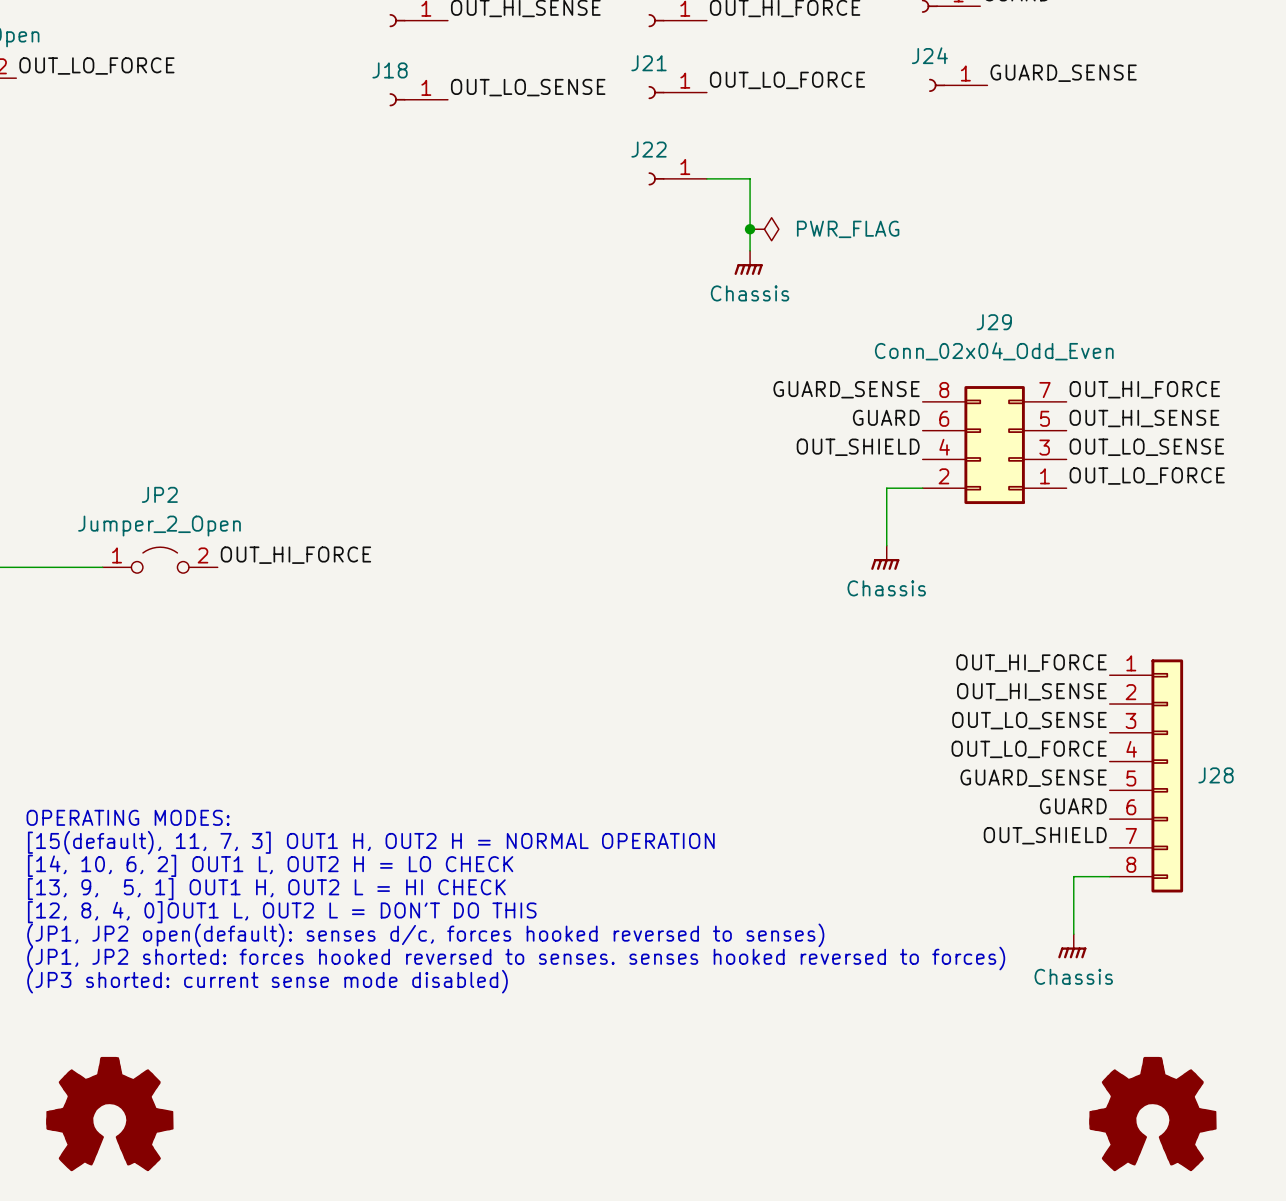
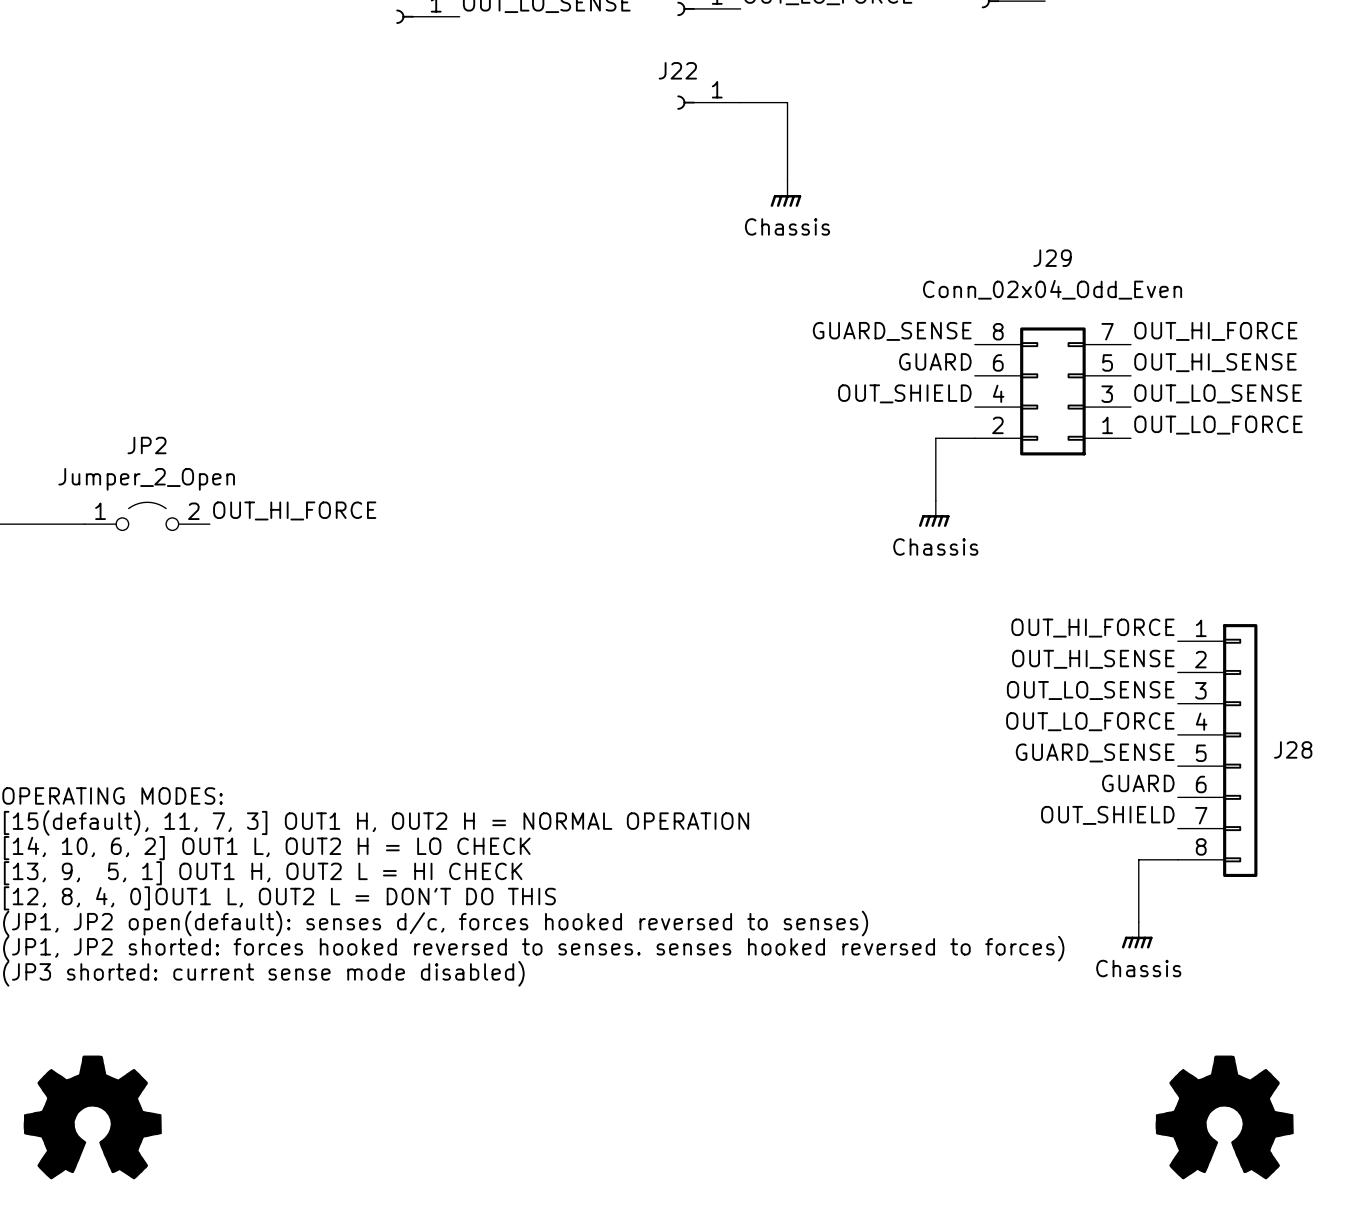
junction: (750, 229) -> none
power symbol: PWR_FLAG (764, 229) -> none

